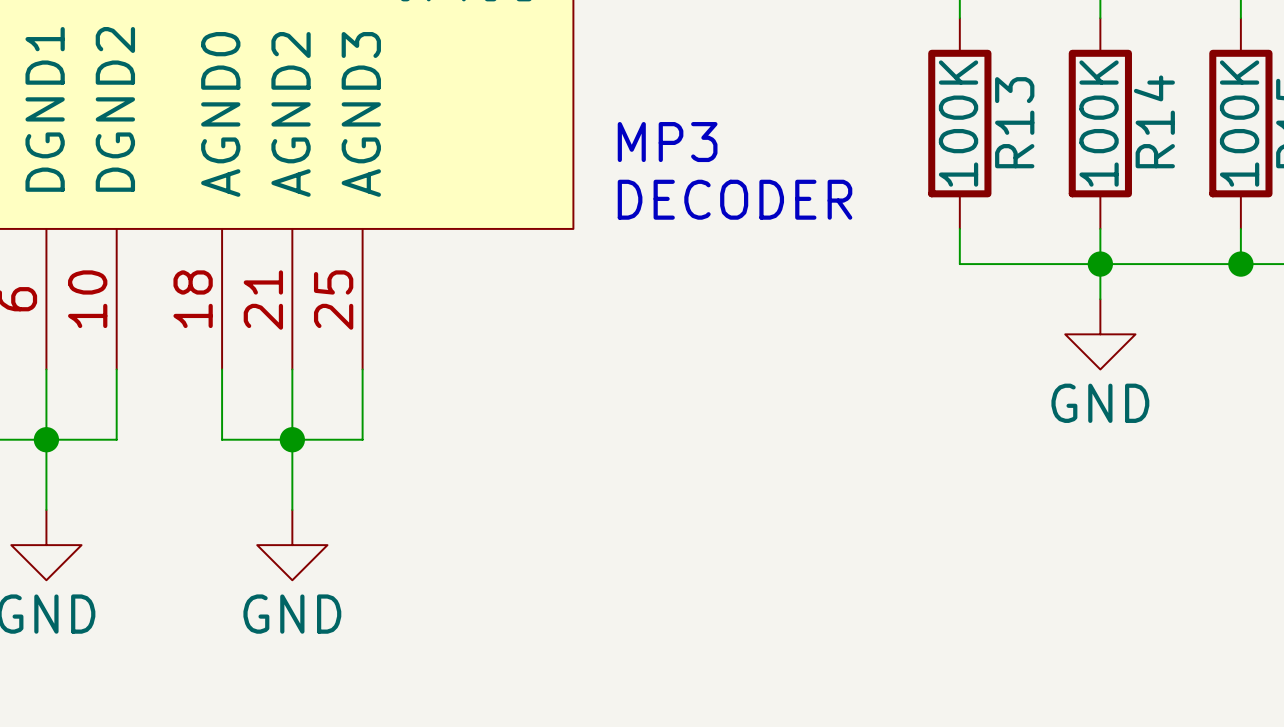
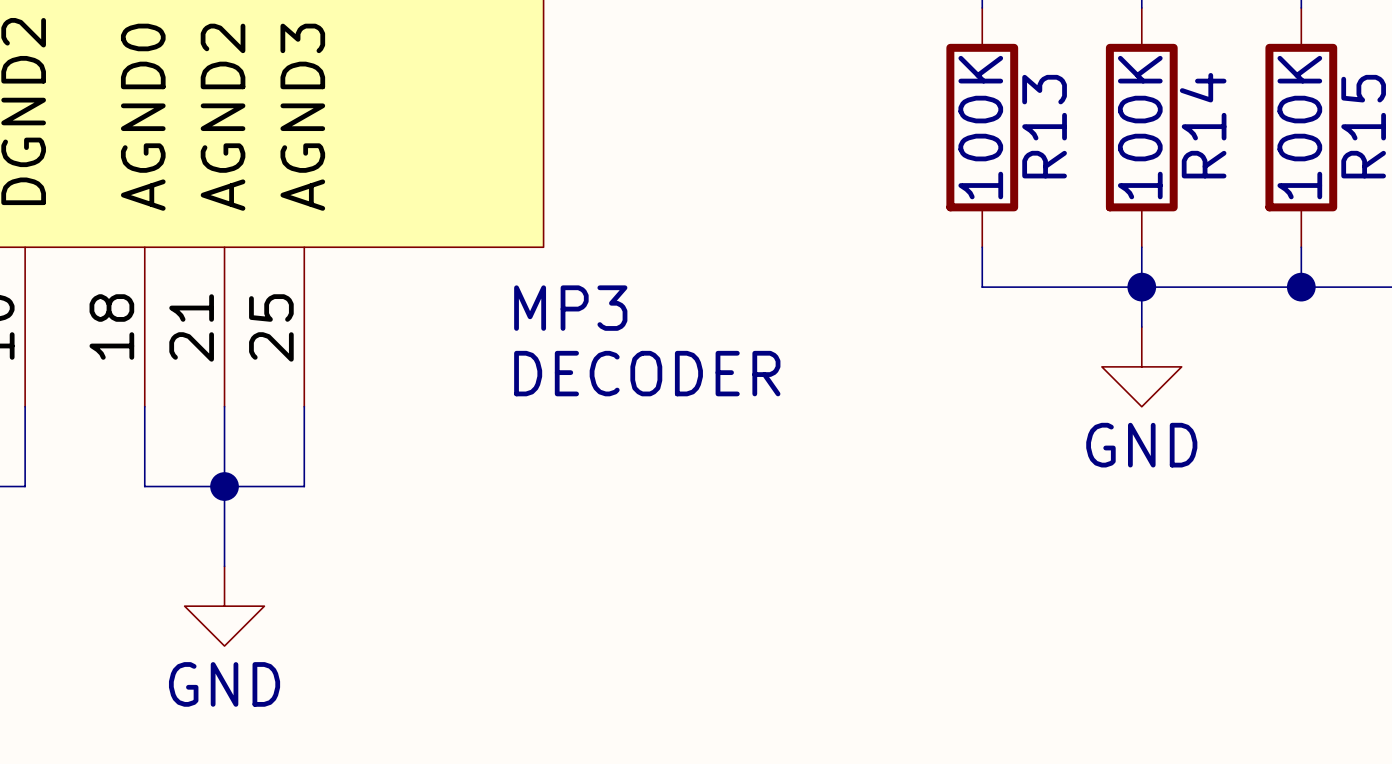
text position: MP3 (667, 142) -> MP3 (570, 308)
text position: DECODER (735, 199) -> DECODER (647, 373)

